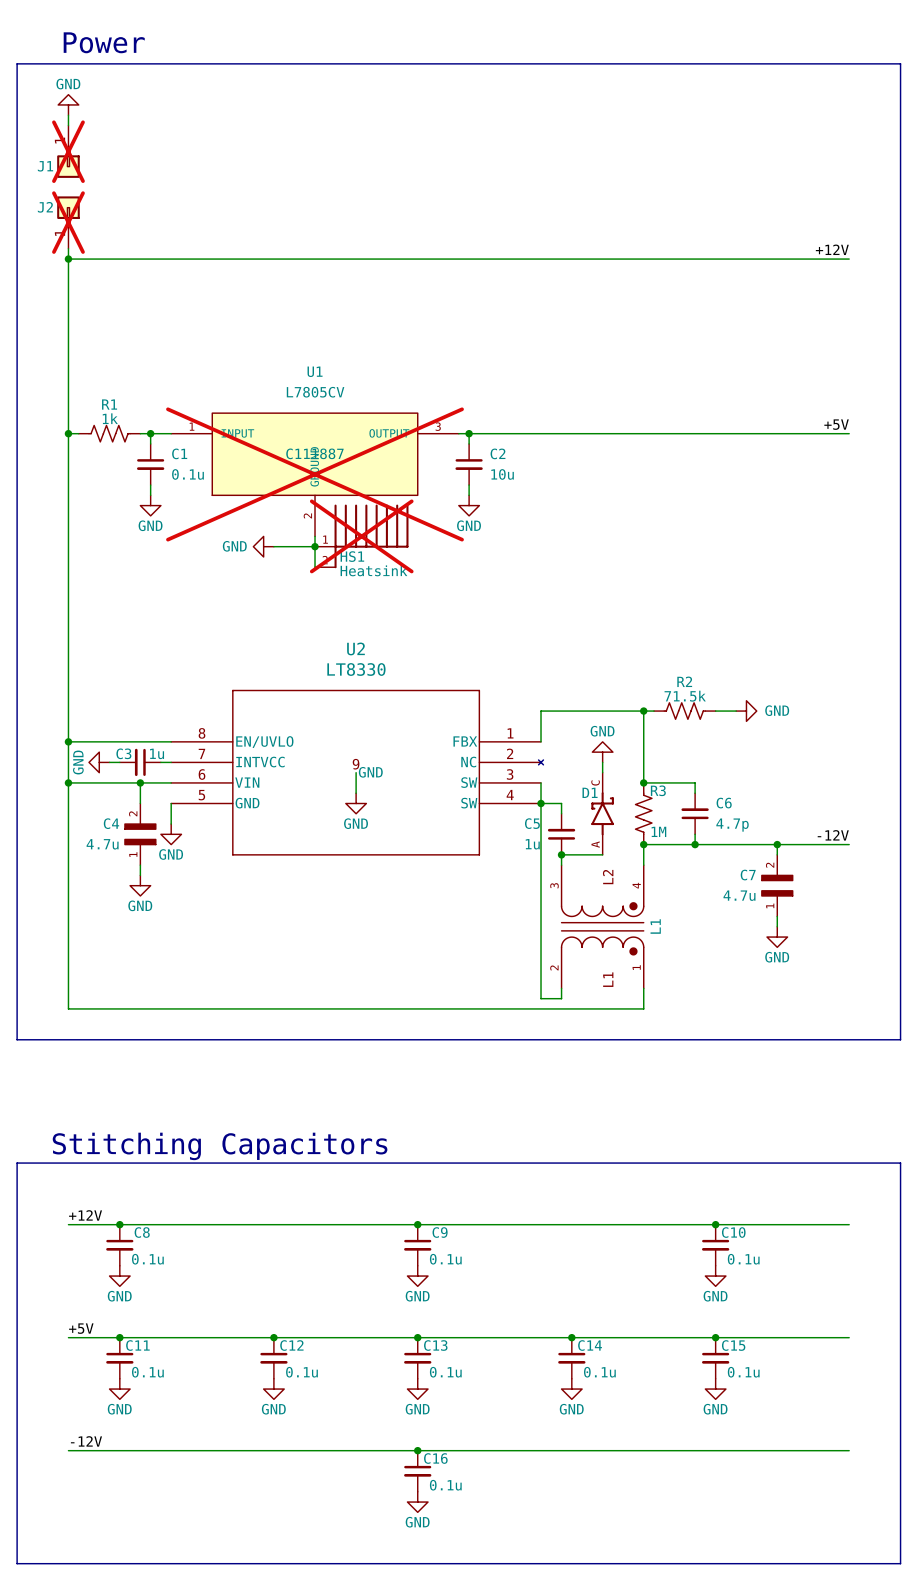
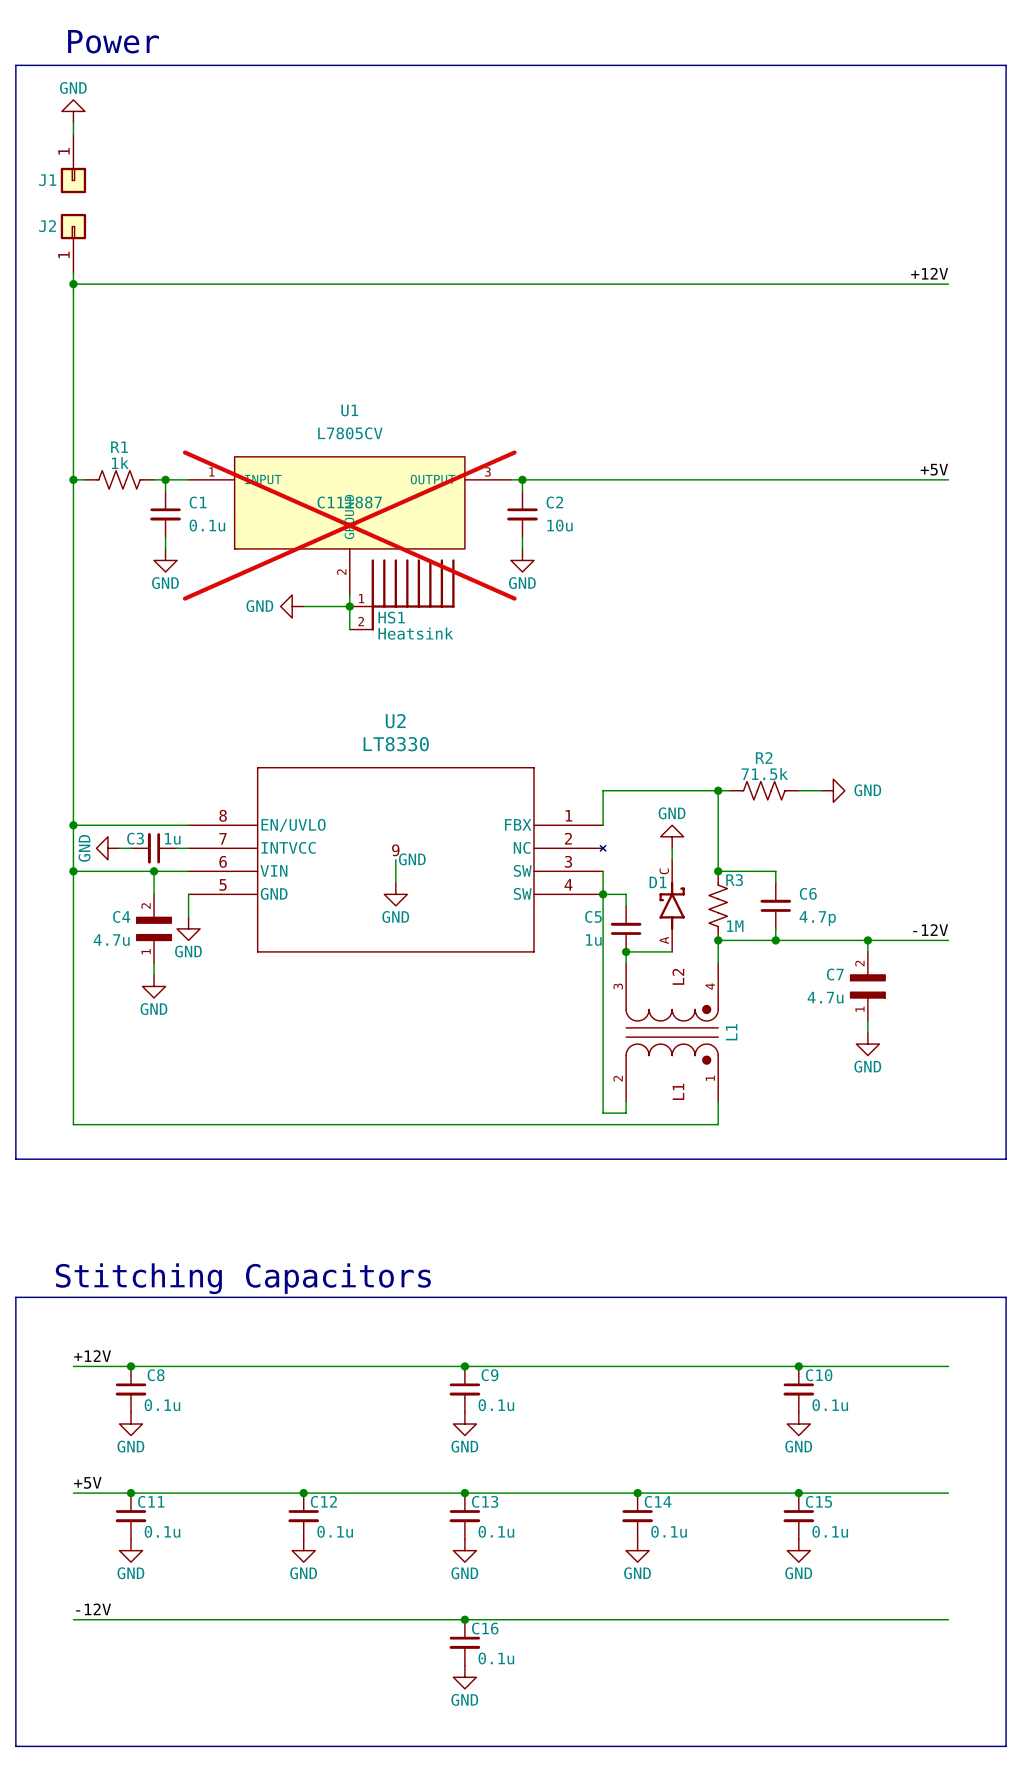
J1 do-not-place cross: (68, 151) -> none
J2 do-not-place cross: (68, 222) -> none
HS1 do-not-place cross: (361, 536) -> none

